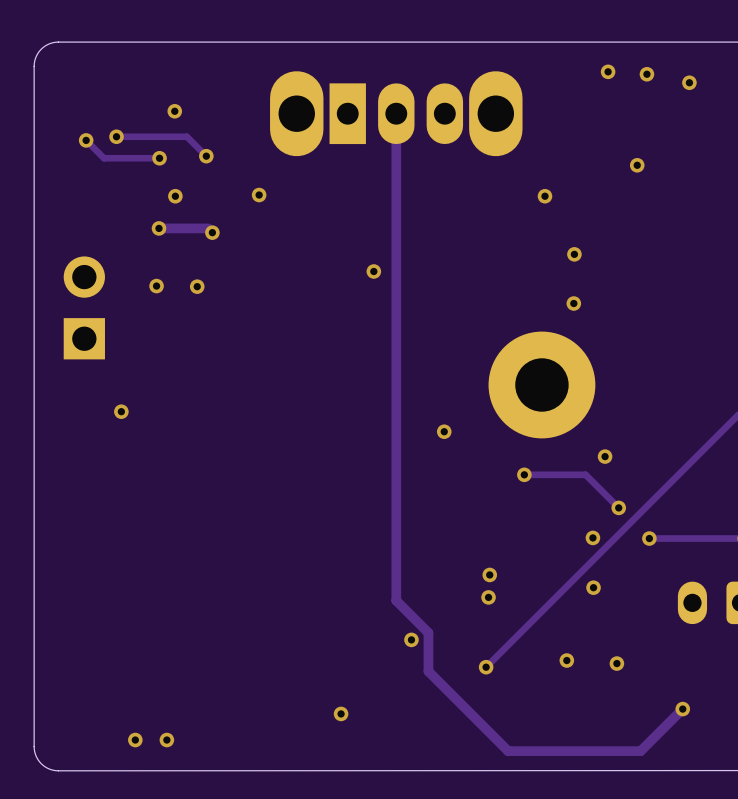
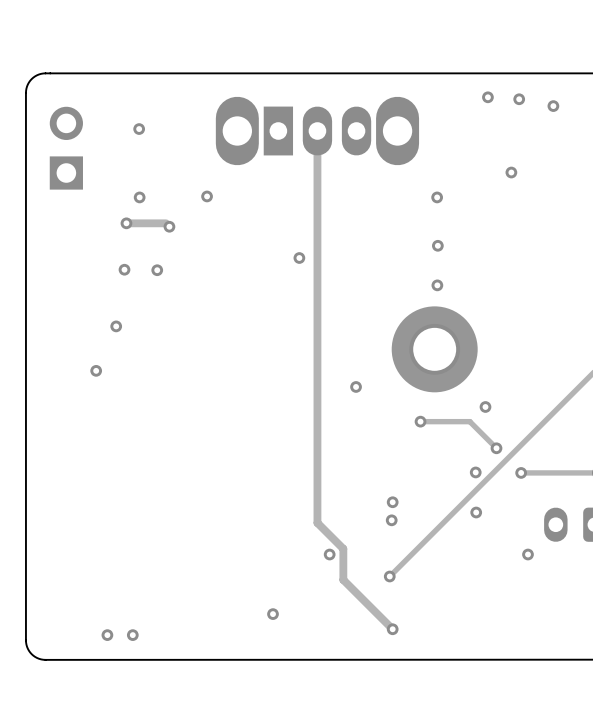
track: (116, 136) (186, 136) (206, 156) -> none
via: (116, 136) -> none
track: (86, 140) (104, 158) (159, 158) -> none
via: (86, 140) -> none
via: (206, 156) -> none
via: (159, 158) -> none
via: (574, 254) -> none
via: none -> (437, 245)
via: (573, 303) -> none
via: none -> (437, 285)
part position: (84, 307) -> (66, 148)
via: none -> (116, 326)
via: none -> (527, 554)
via: (566, 660) -> none
via: (616, 663) -> none
track: (682, 709) (640, 751) (508, 751) (489, 732) -> none
via: (682, 709) -> none
via: none -> (392, 629)

